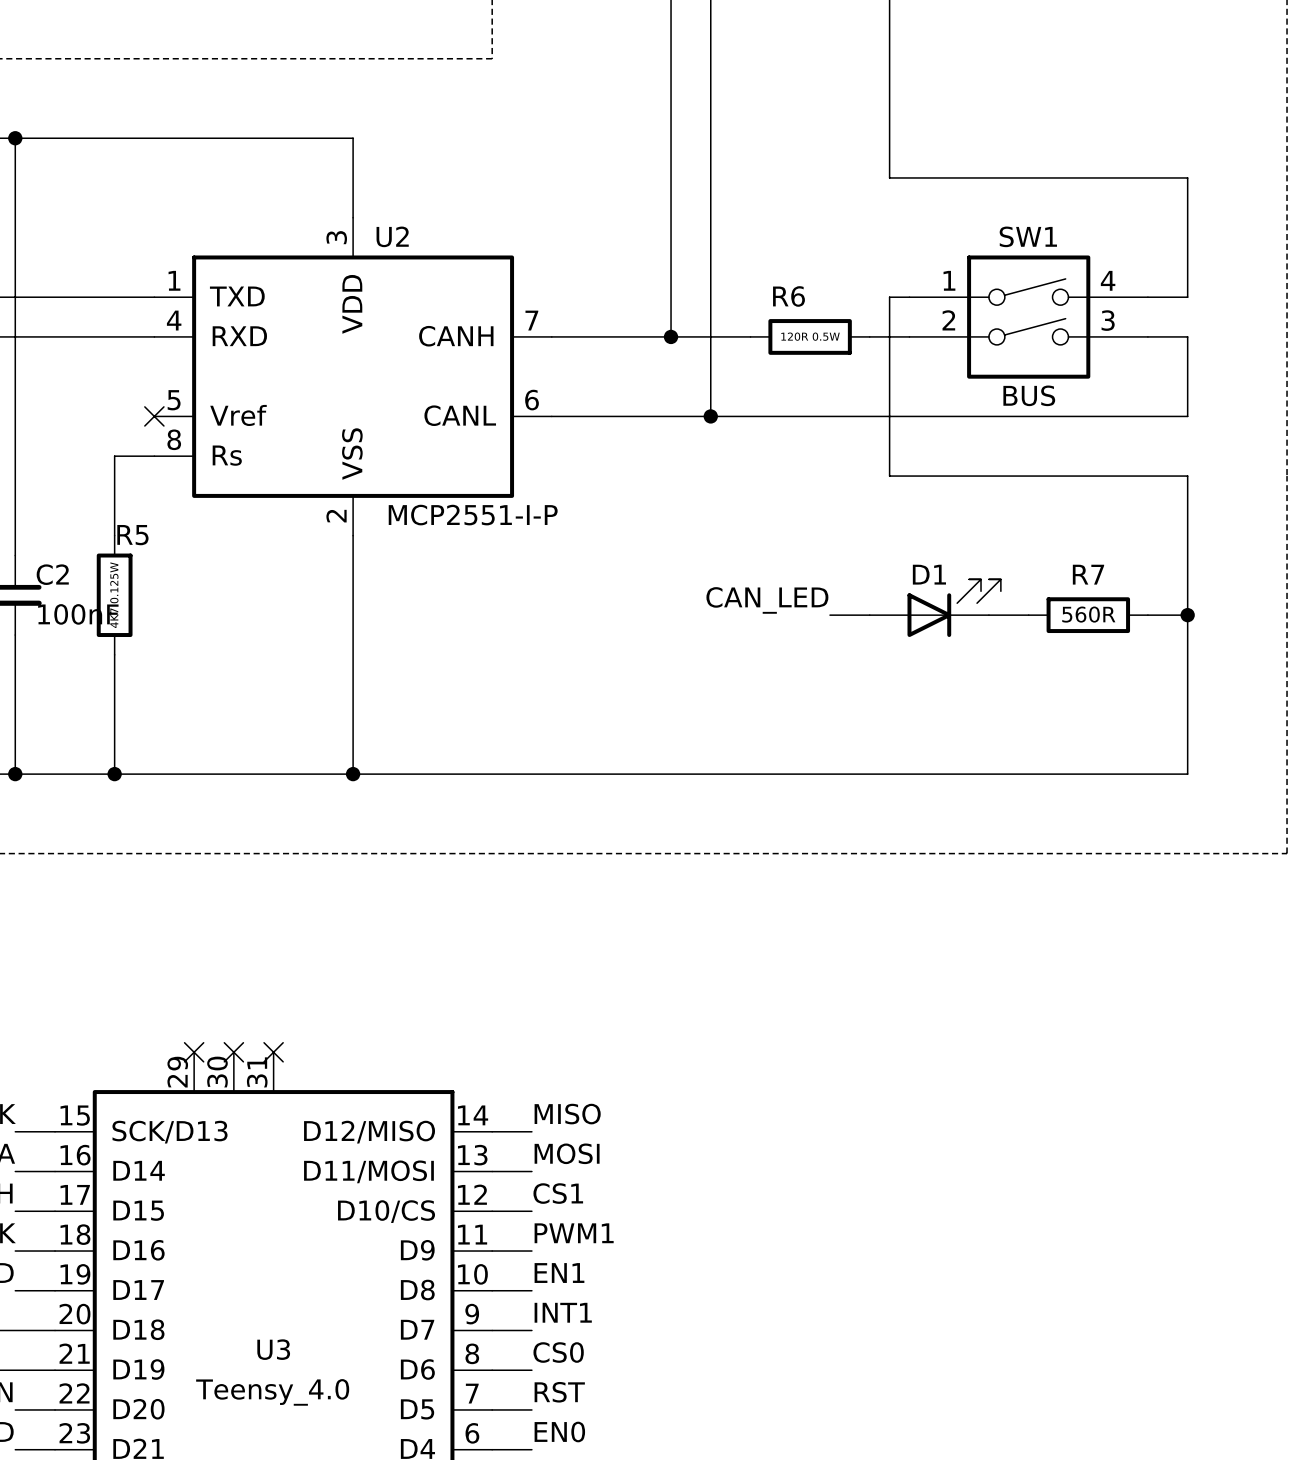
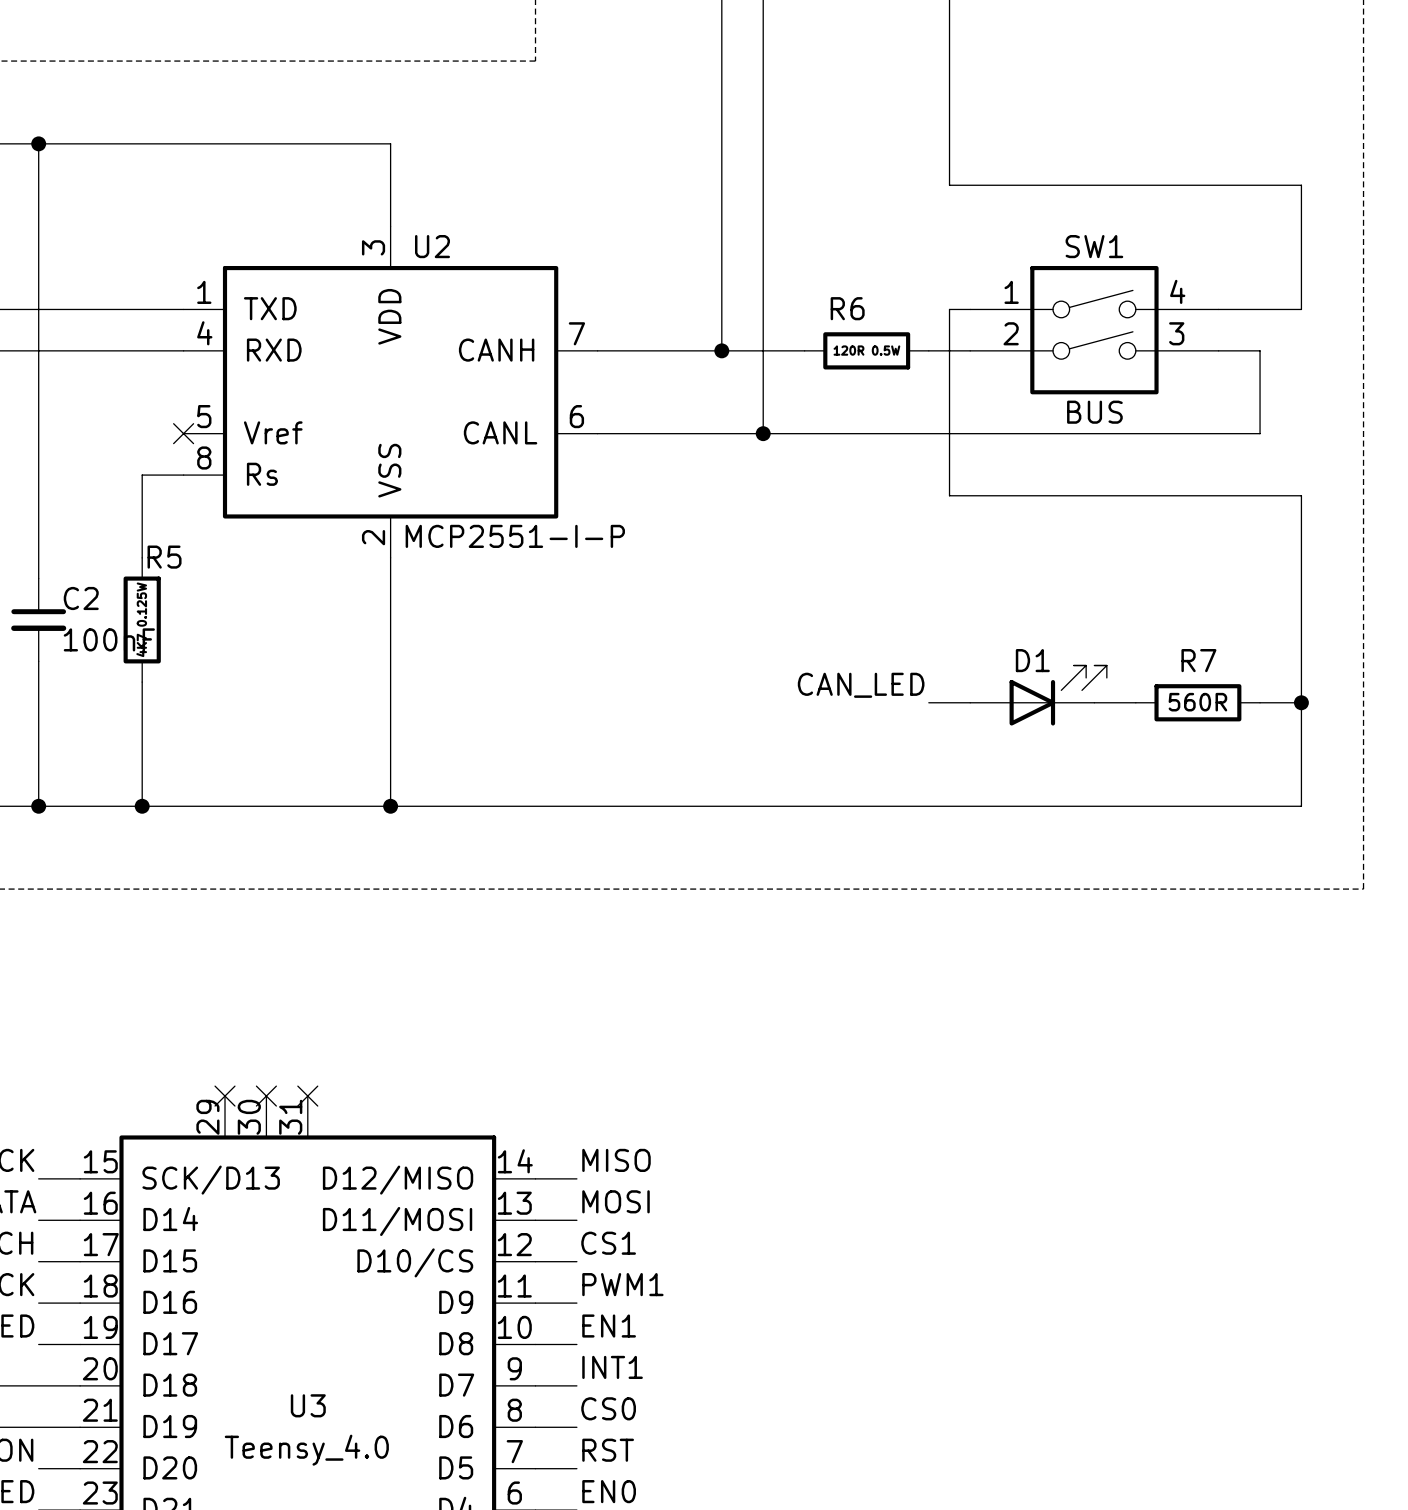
wire: (1187, 177) (1187, 297) -> (1260, 185) (1301, 185) (1301, 309) (1260, 309)
wire: (1187, 476) (1187, 774) -> (1260, 495) (1301, 495) (1301, 806) (1260, 806)
label position: CAN_LED (767, 600) -> CAN_LED (861, 685)
D1 position: (935, 608) -> (1038, 695)
wire: (829, 615) (869, 615) -> (928, 702) (970, 702)
wire: (988, 615) (1028, 615) -> (1094, 702) (1135, 702)
R7 position: (1088, 615) -> (1197, 702)
wire: (1147, 615) (1187, 615) -> (1260, 702) (1301, 702)
junction position: (1187, 615) -> (1301, 702)

